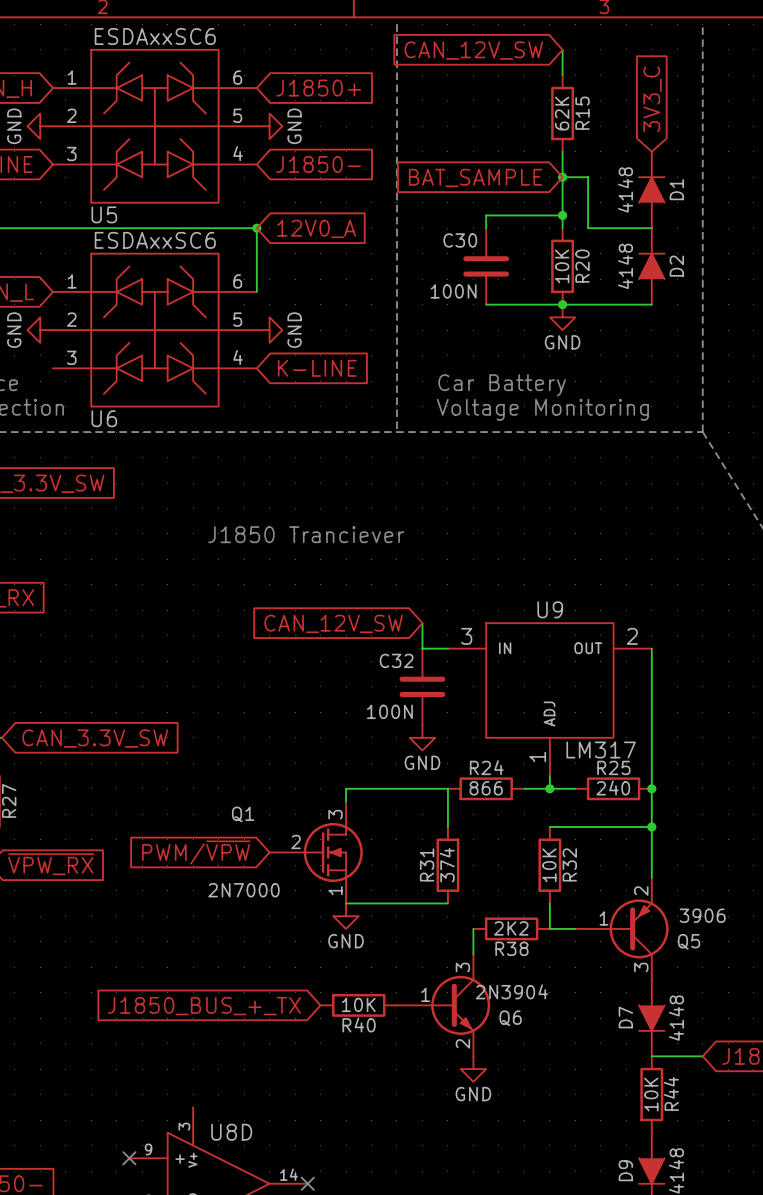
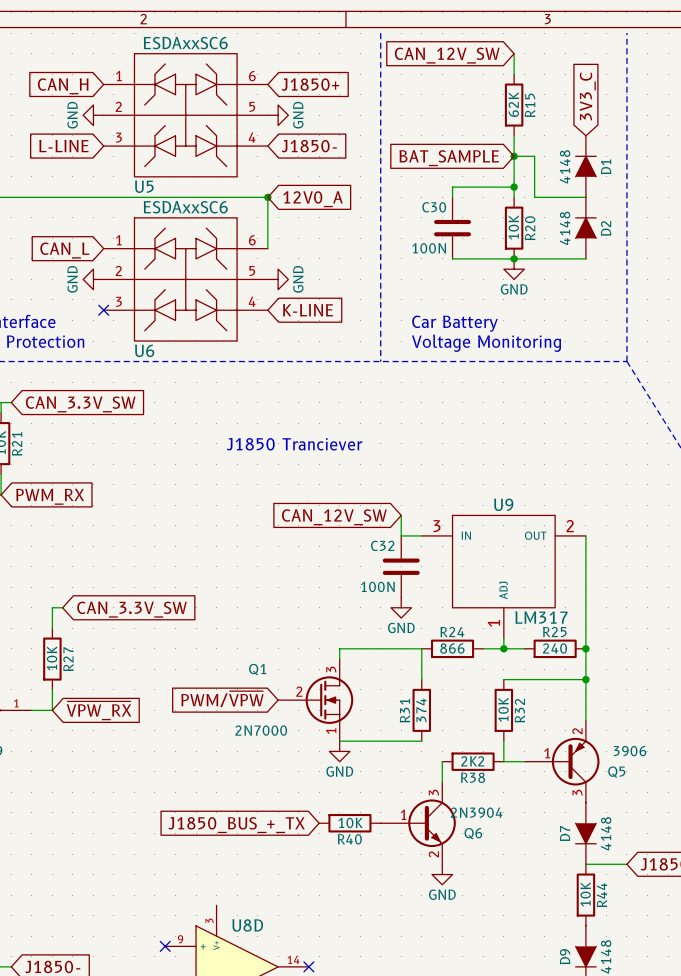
no-connect mark: none -> (103, 310)

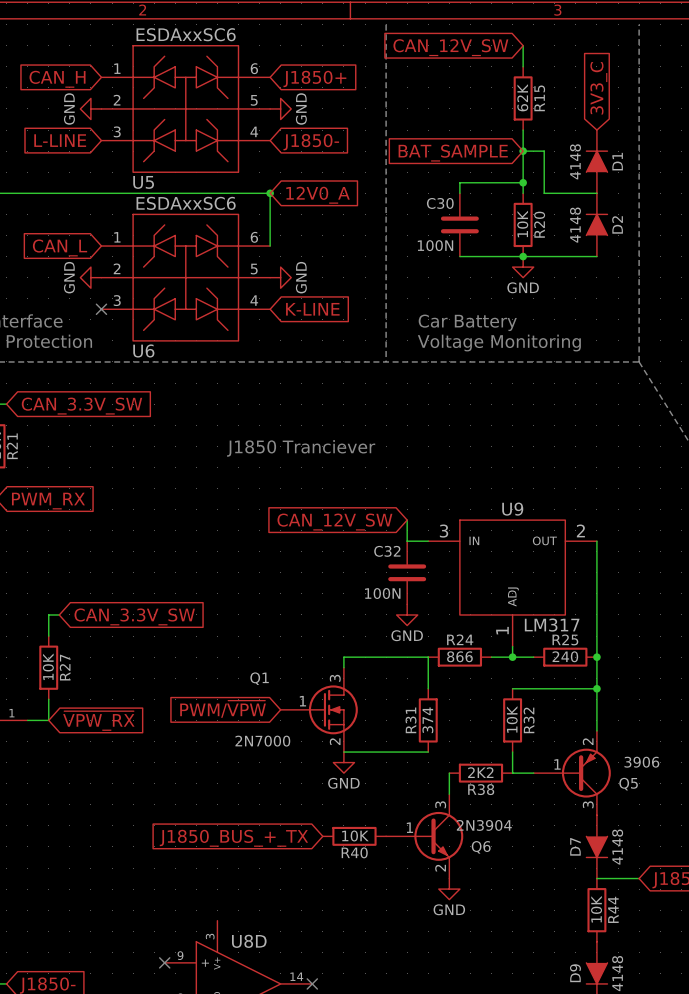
Q1 pin number: 2 (299, 691) -> 1 (302, 701)
Q1 pin number: 1 (331, 731) -> 2 (335, 741)

